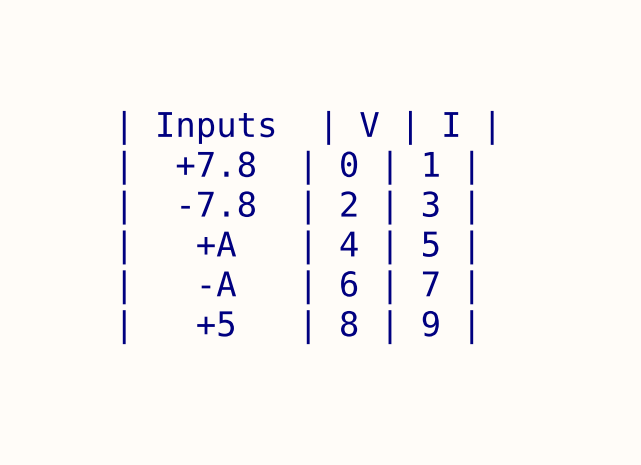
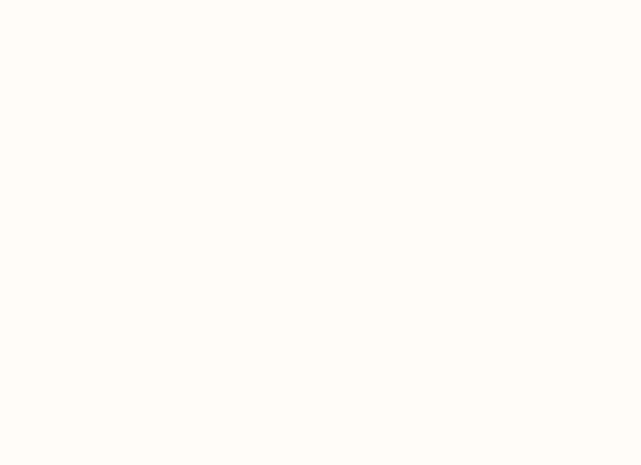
text: | Inputs | V | I | (308, 127) -> none
text: | +7.8 | 0 | 1 | (297, 167) -> none
text: | -7.8 | 2 | 3 | (297, 207) -> none
text: | +A | 4 | 5 | (297, 247) -> none
text: | -A | 6 | 7 | (297, 287) -> none
text: | +5 | 8 | 9 | (297, 327) -> none

